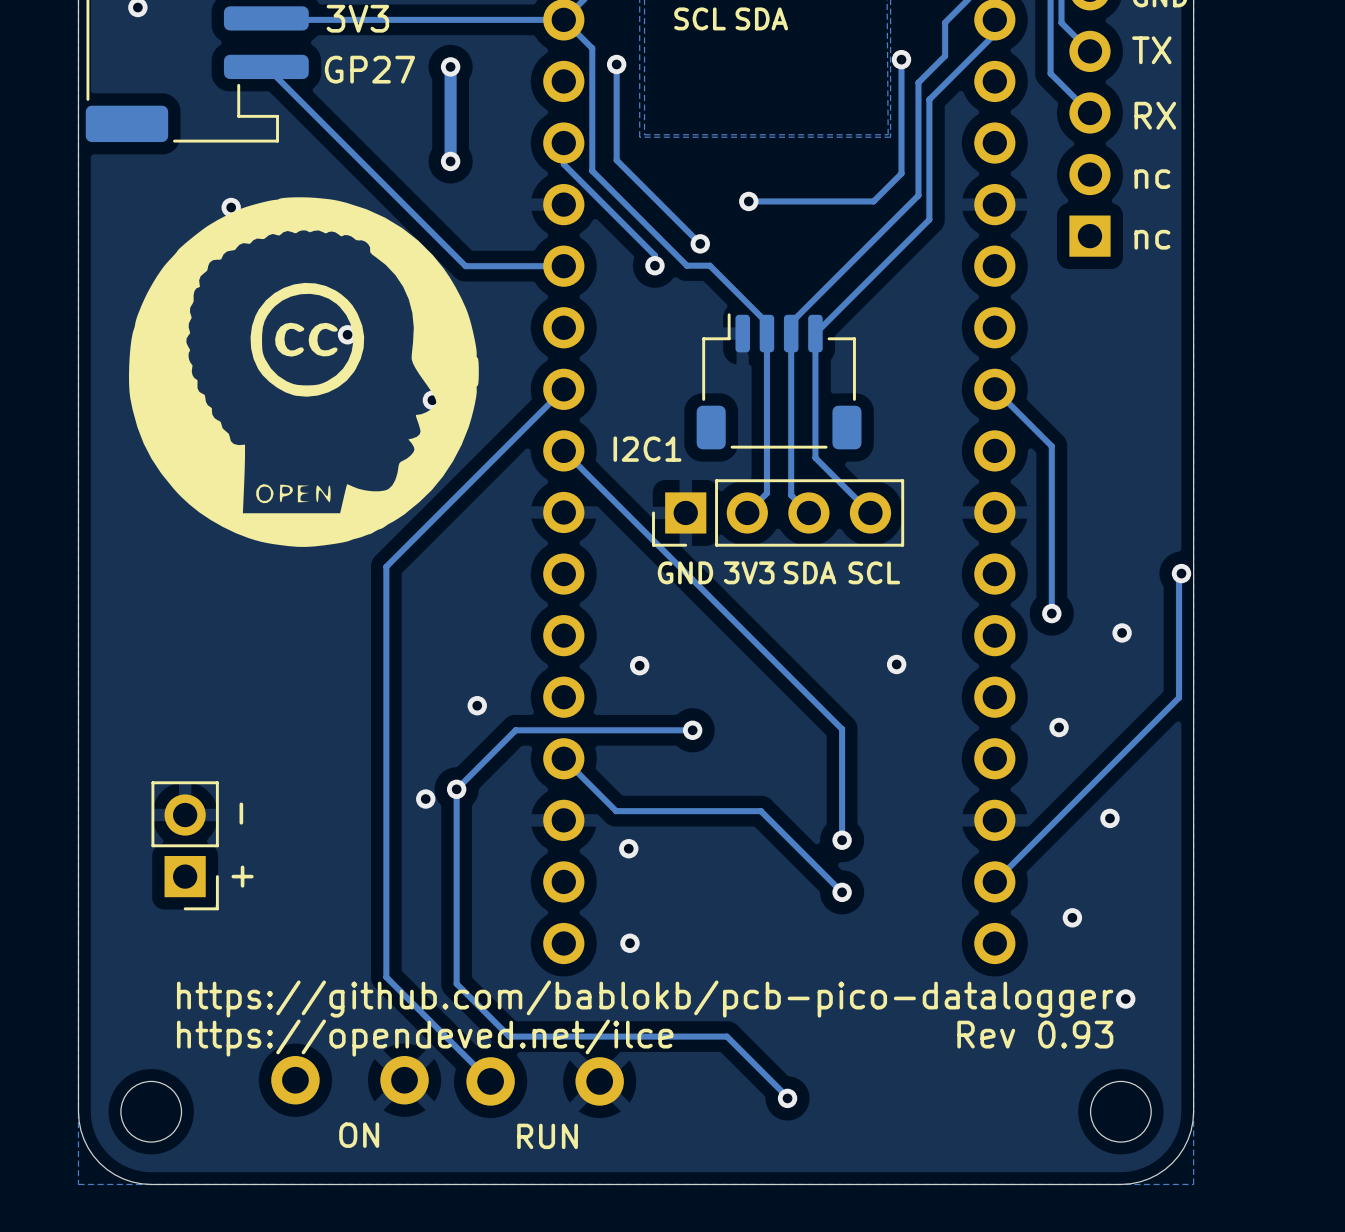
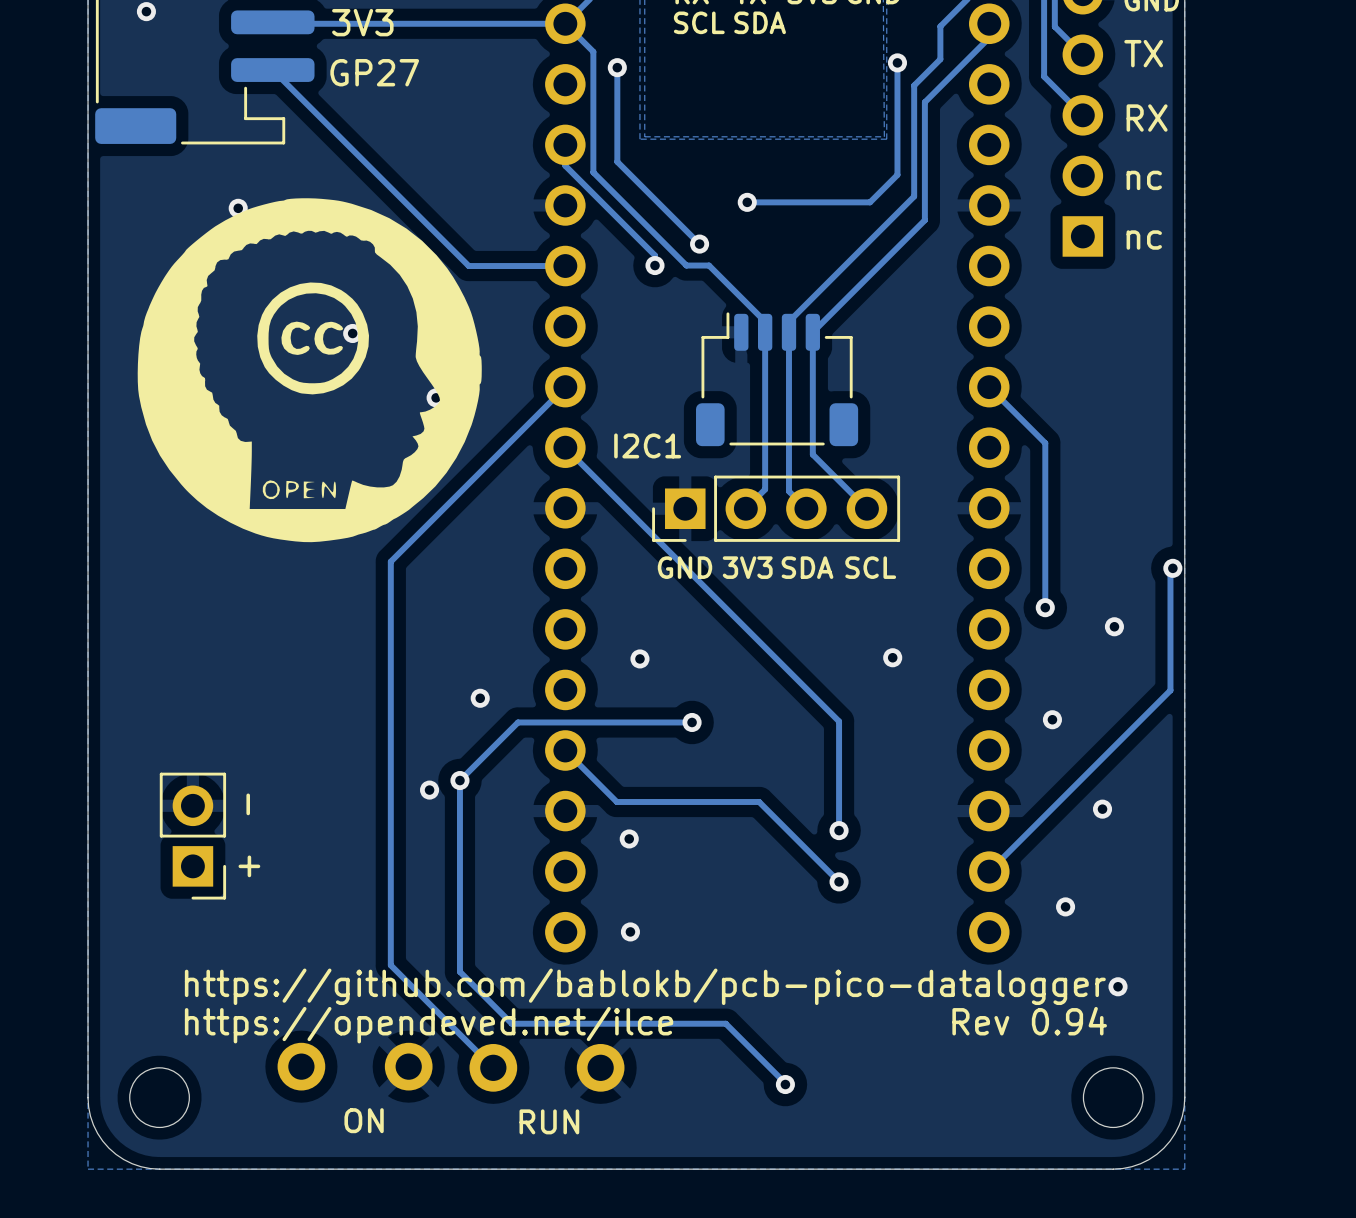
track: (450, 66) (450, 161) -> none
via: (450, 66) -> none
via: (450, 161) -> none
text: https://opendeved.net/ilce Rev 0.93 (645, 1038) -> https://opendeved.net/ilce Rev 0.94 (645, 1025)

